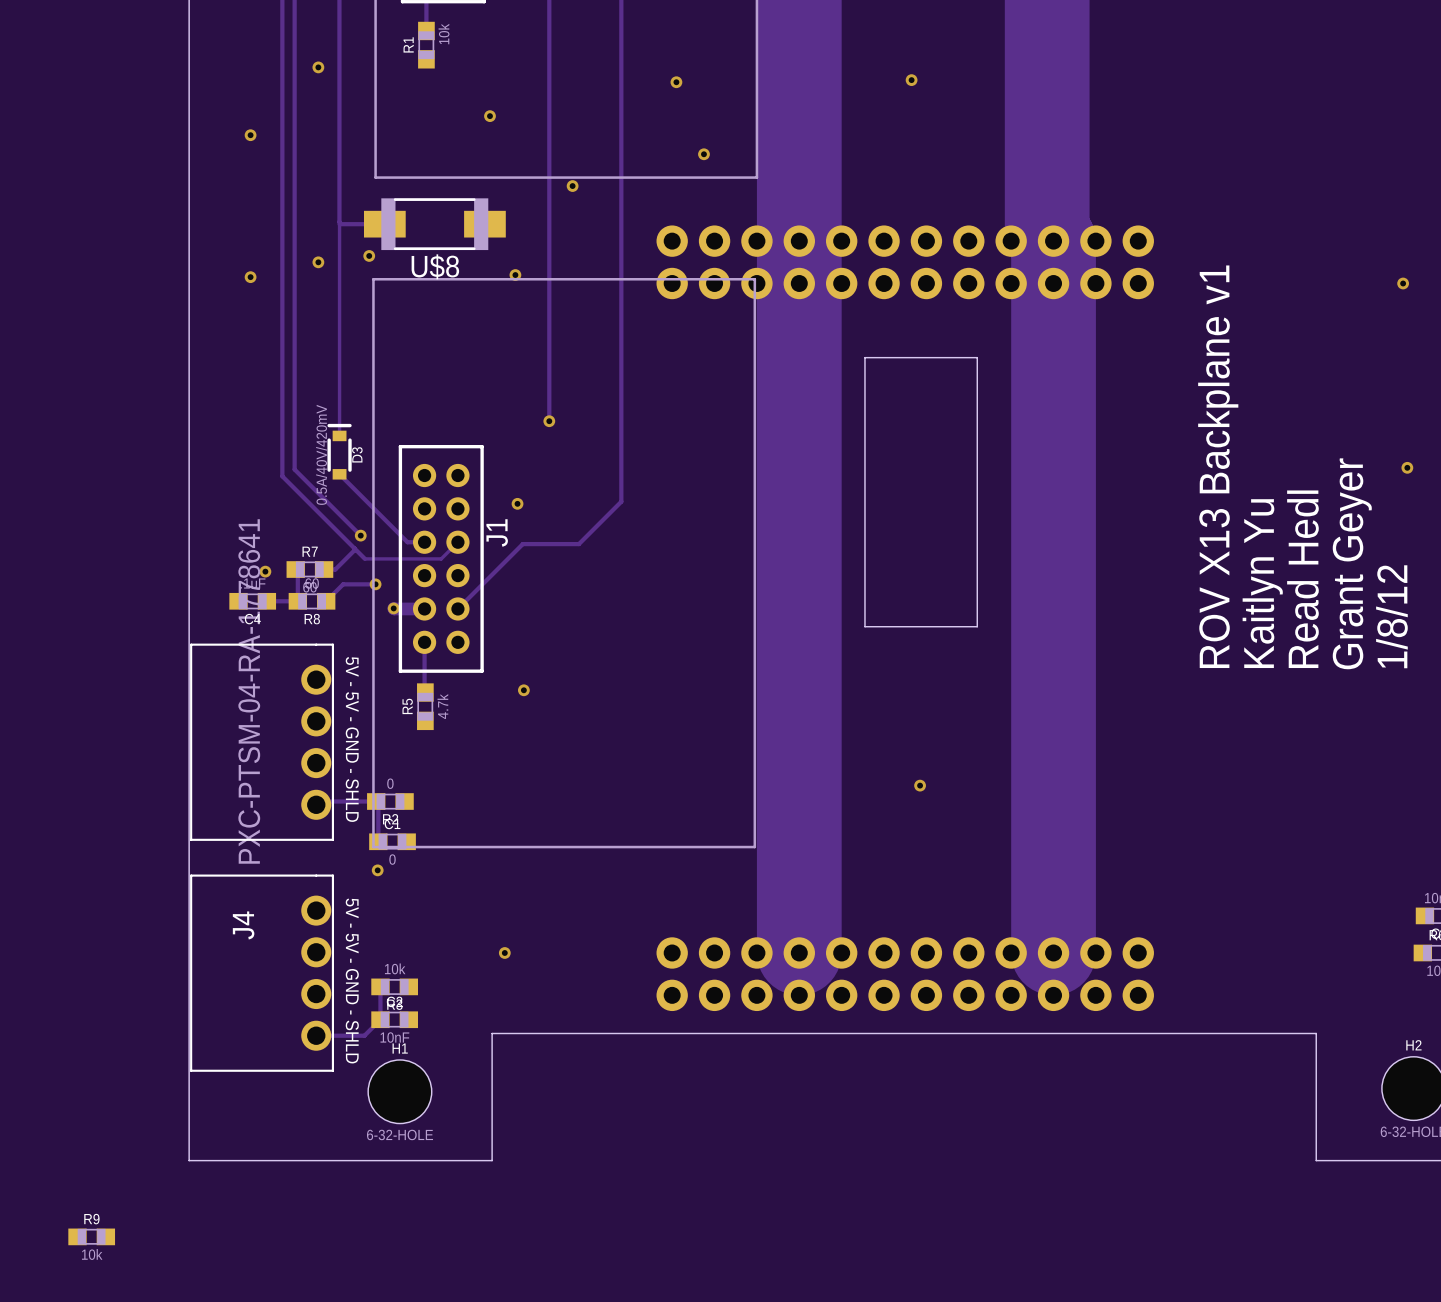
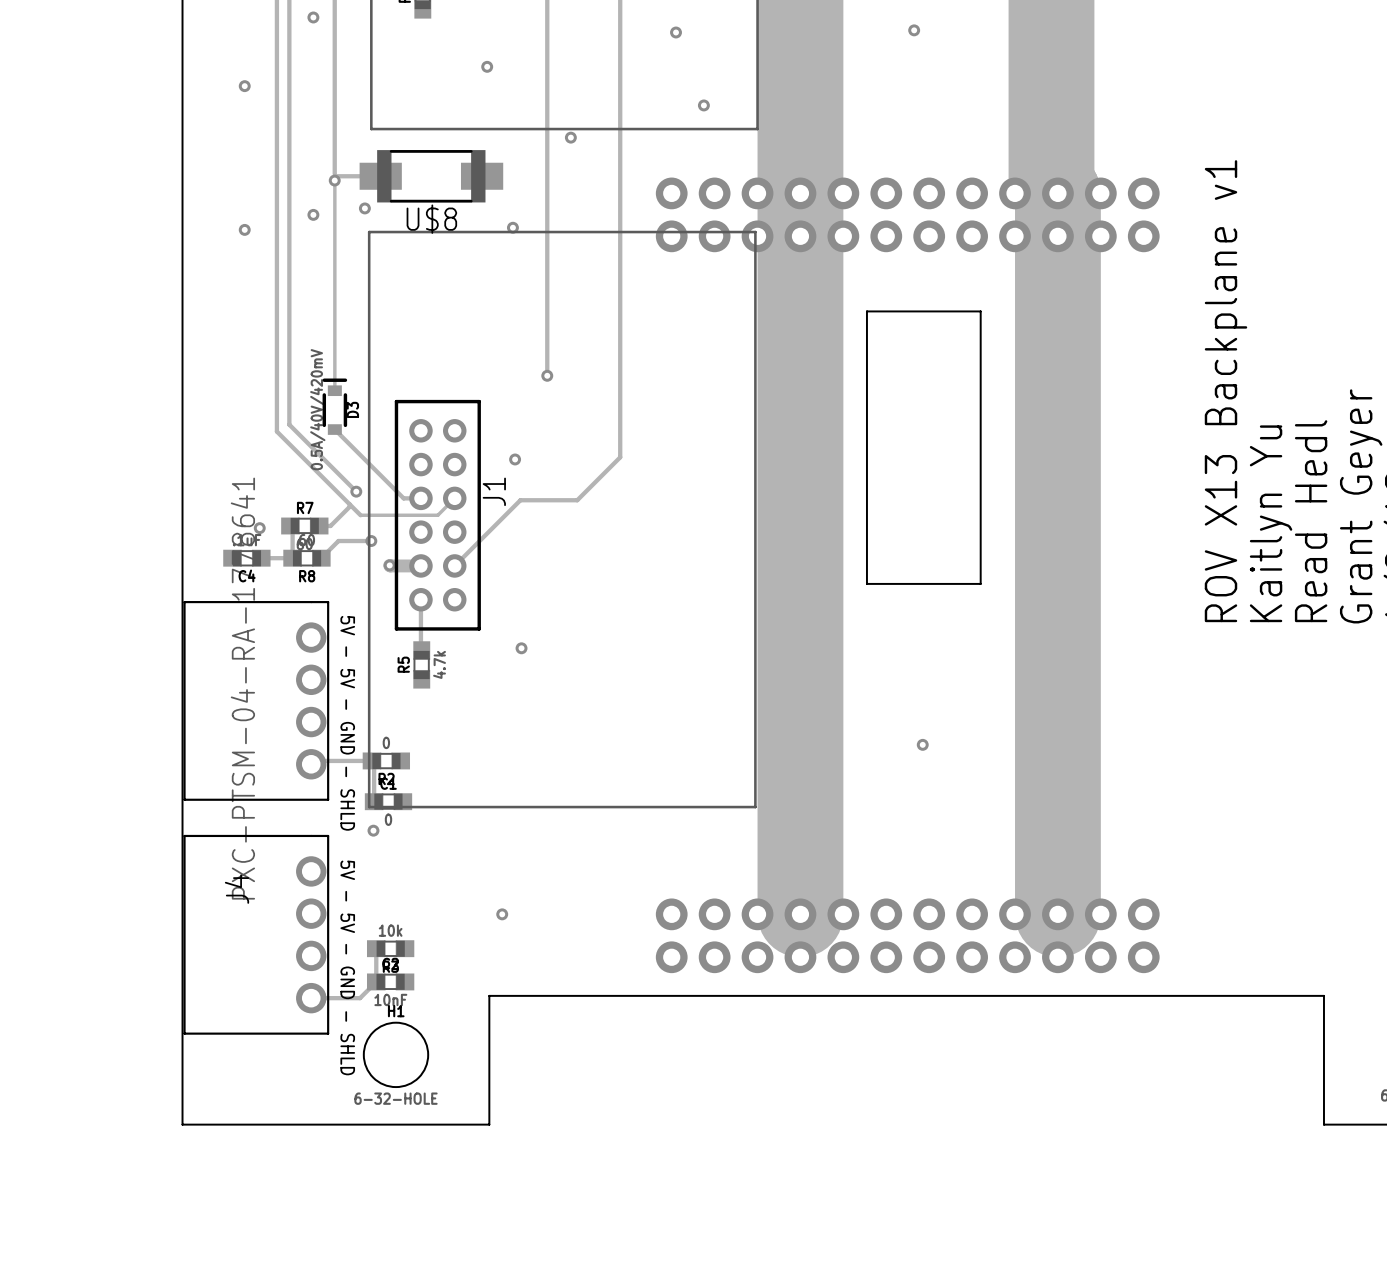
via: none -> (334, 180)
R9: 10k (91, 1236) -> none

